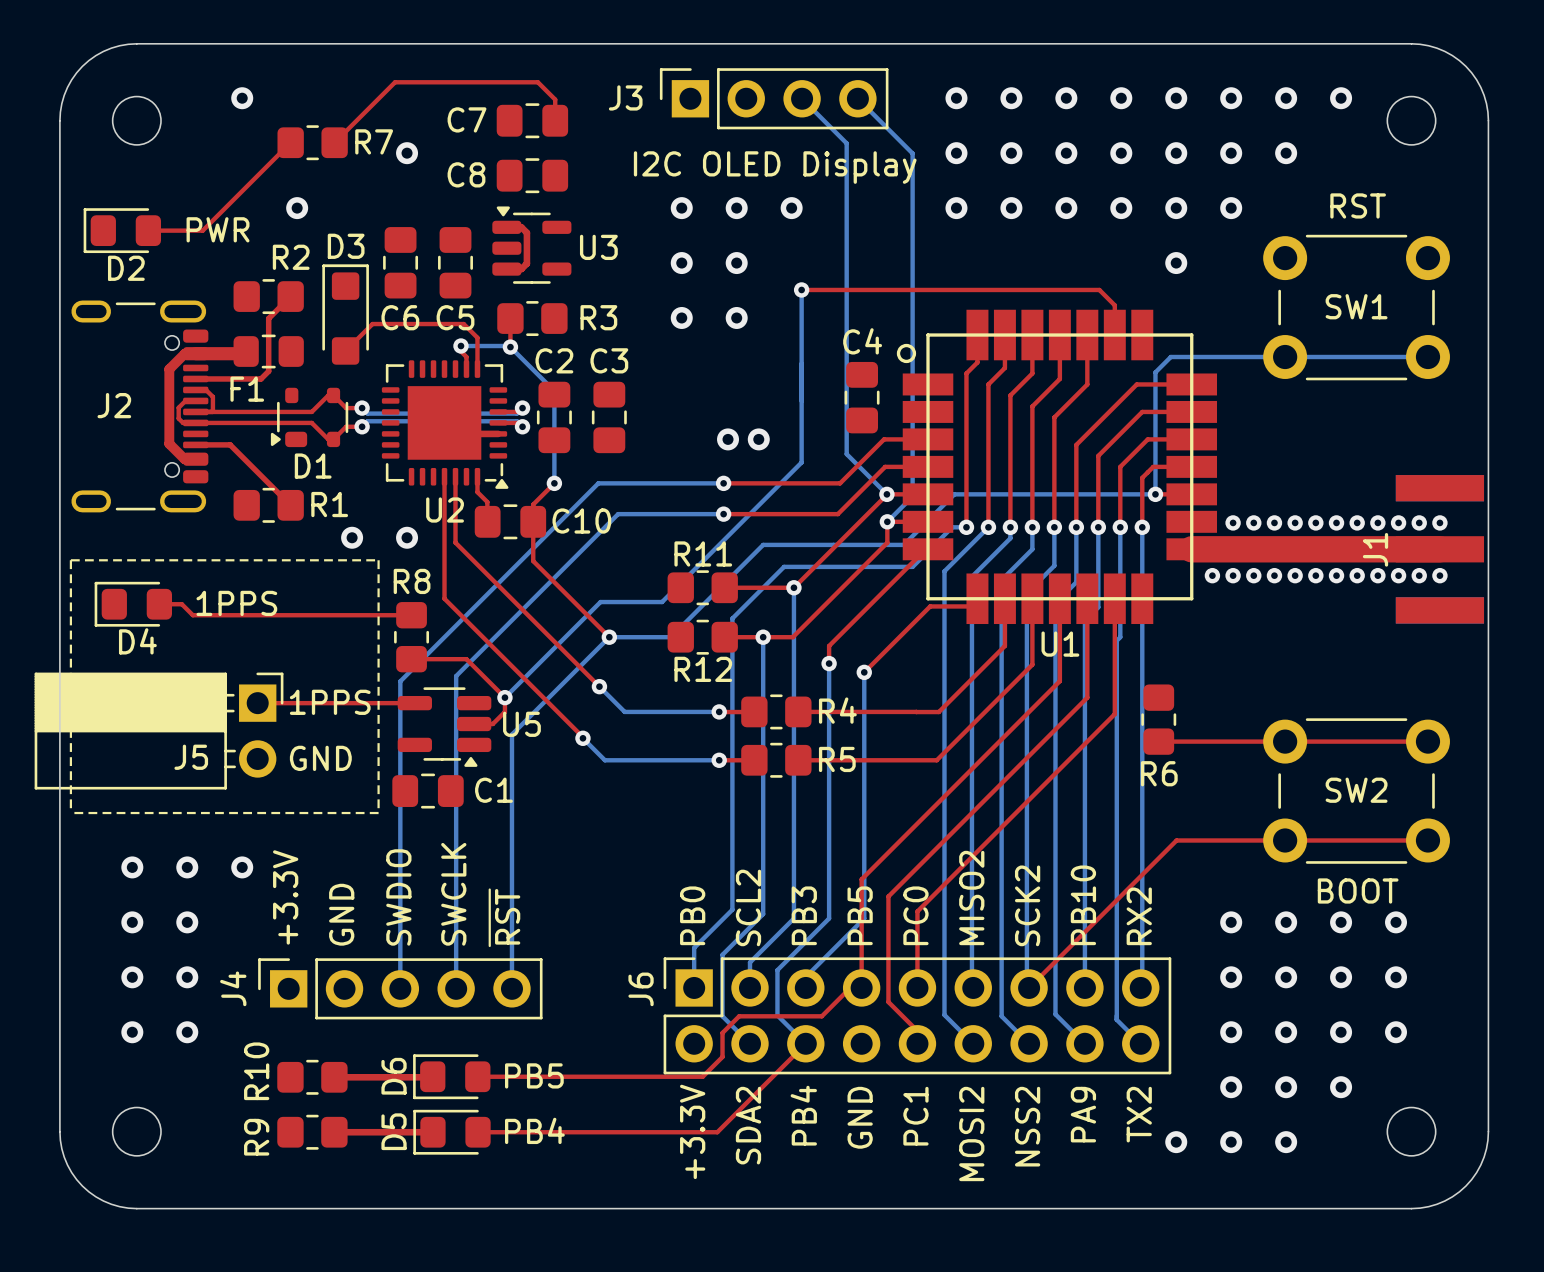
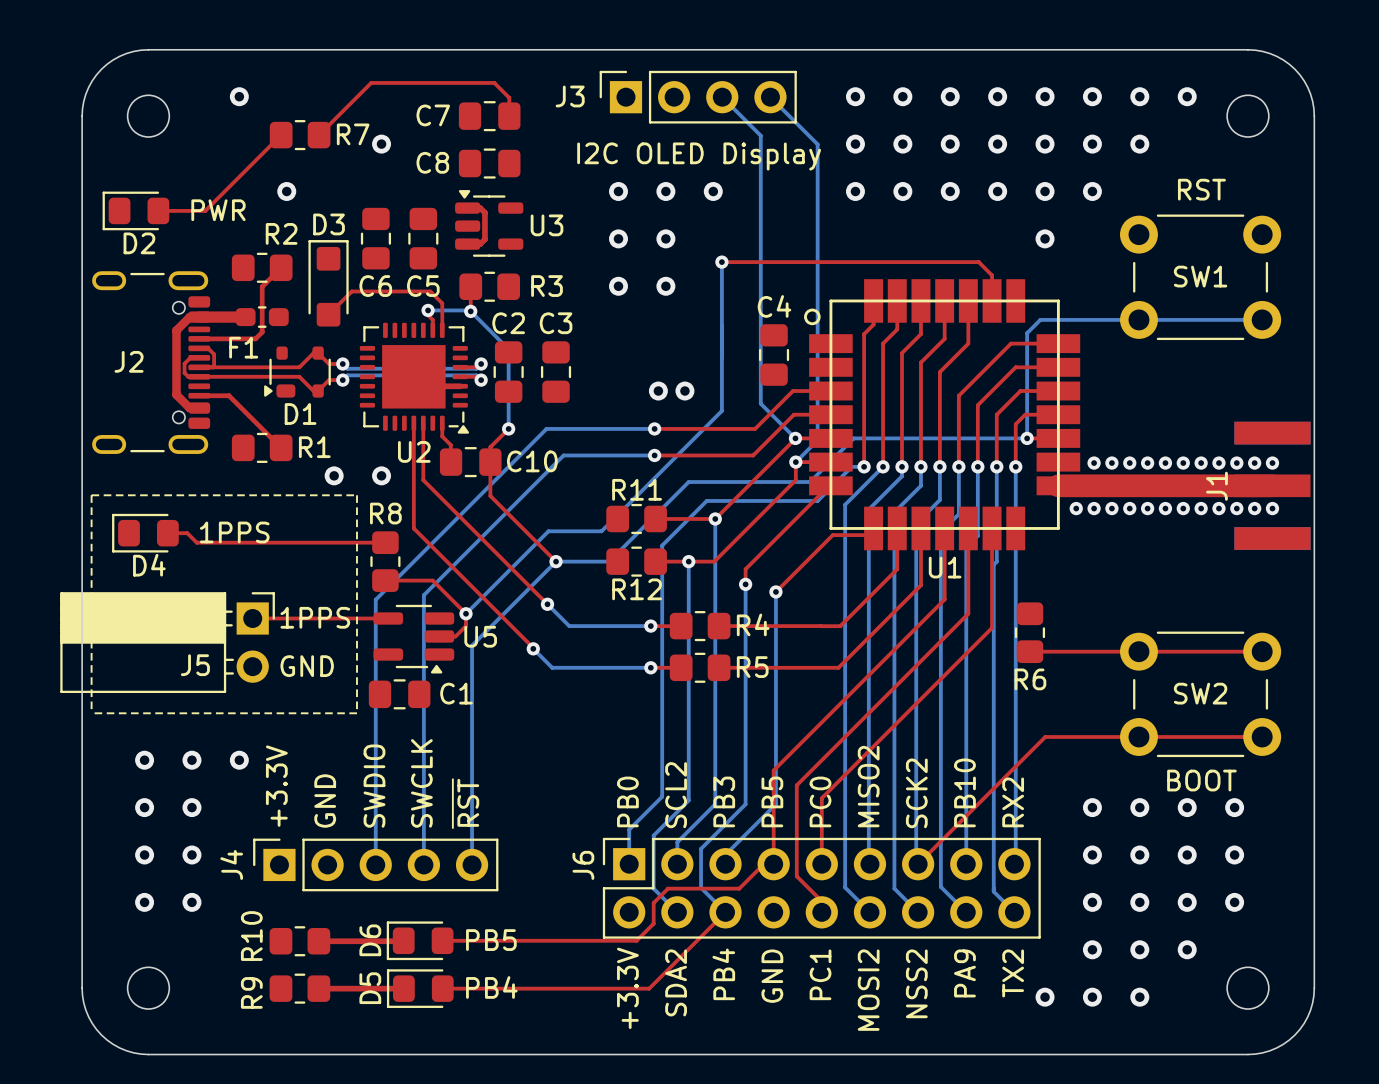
F1 footprint: [233, 334, 304, 369] -> [235, 306, 289, 328]

